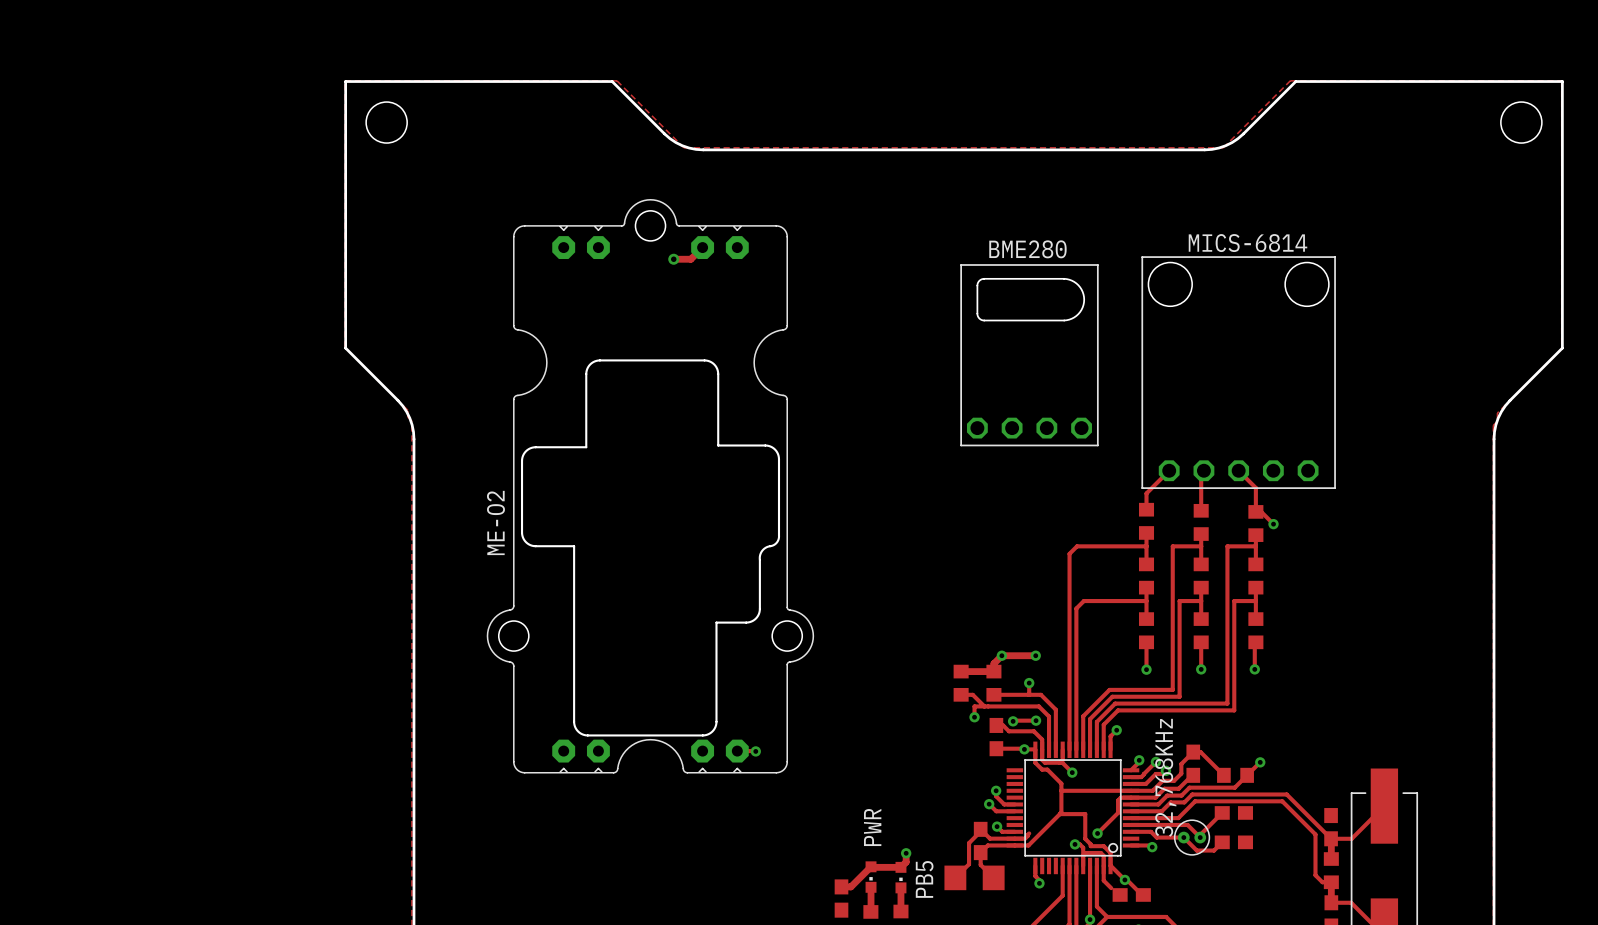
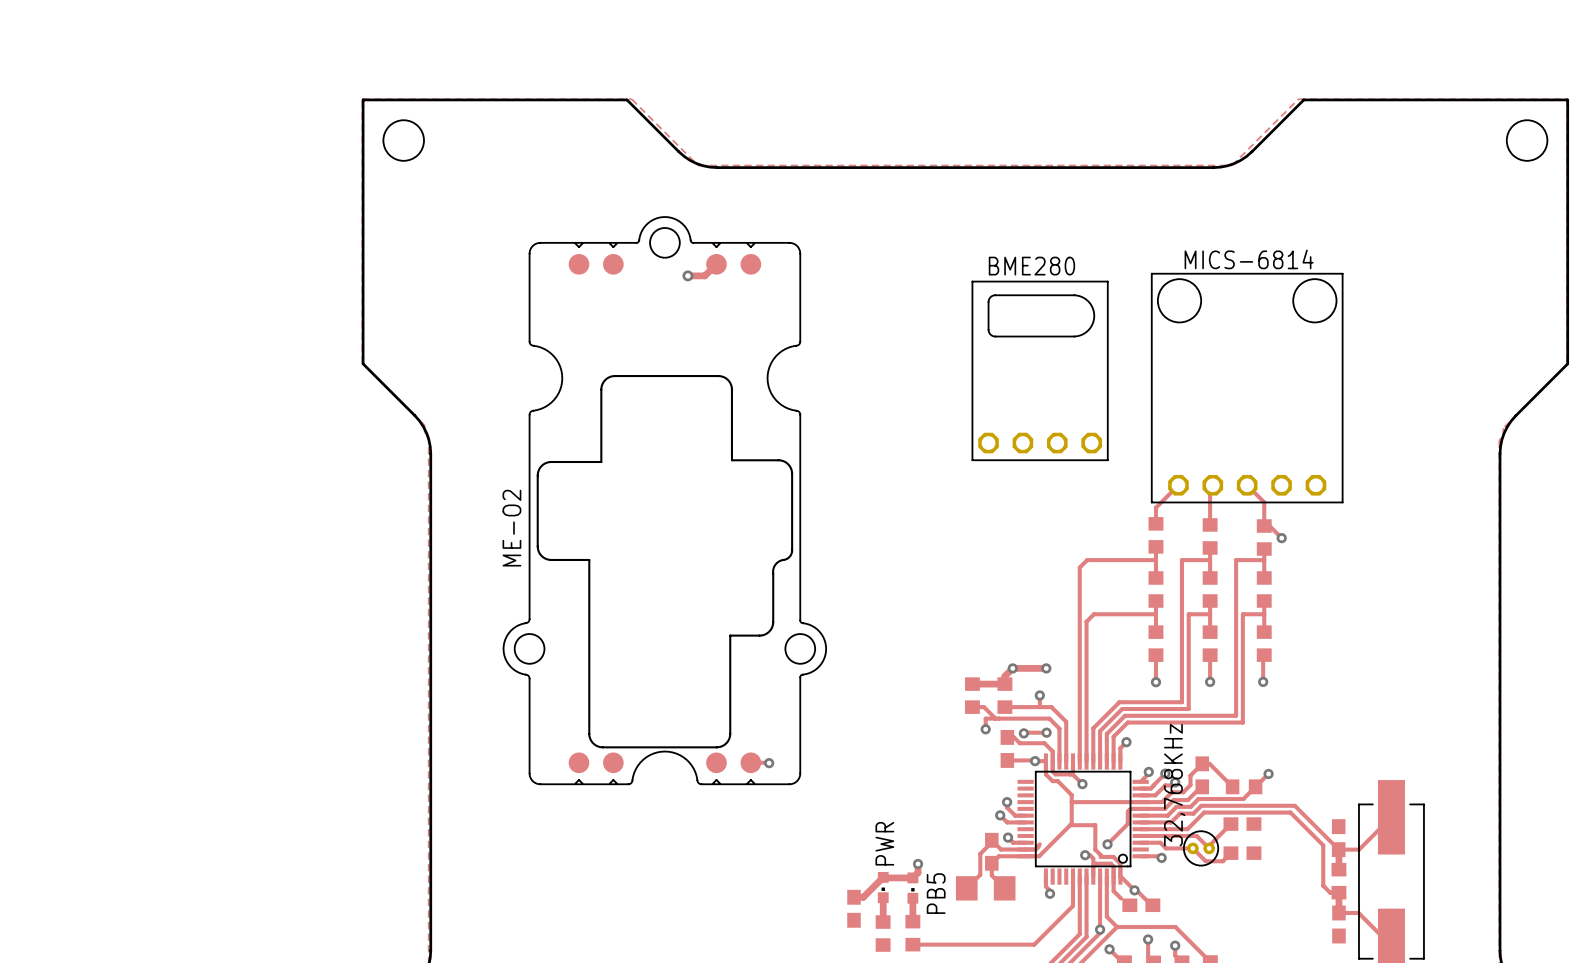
ME-O2 footprint: [486, 199, 815, 774] -> [502, 216, 827, 785]

